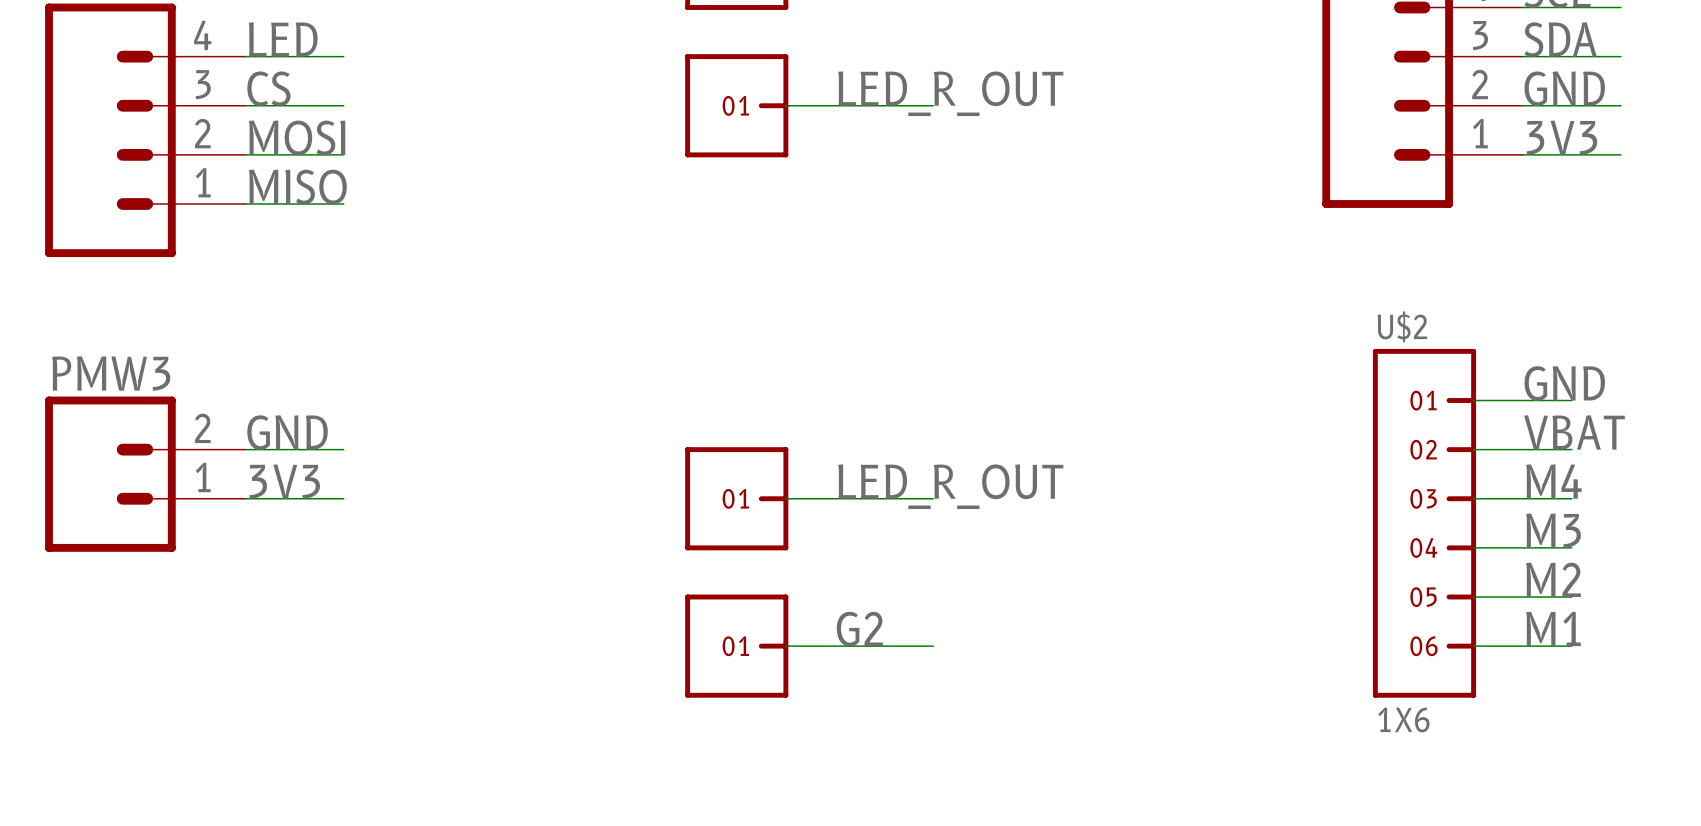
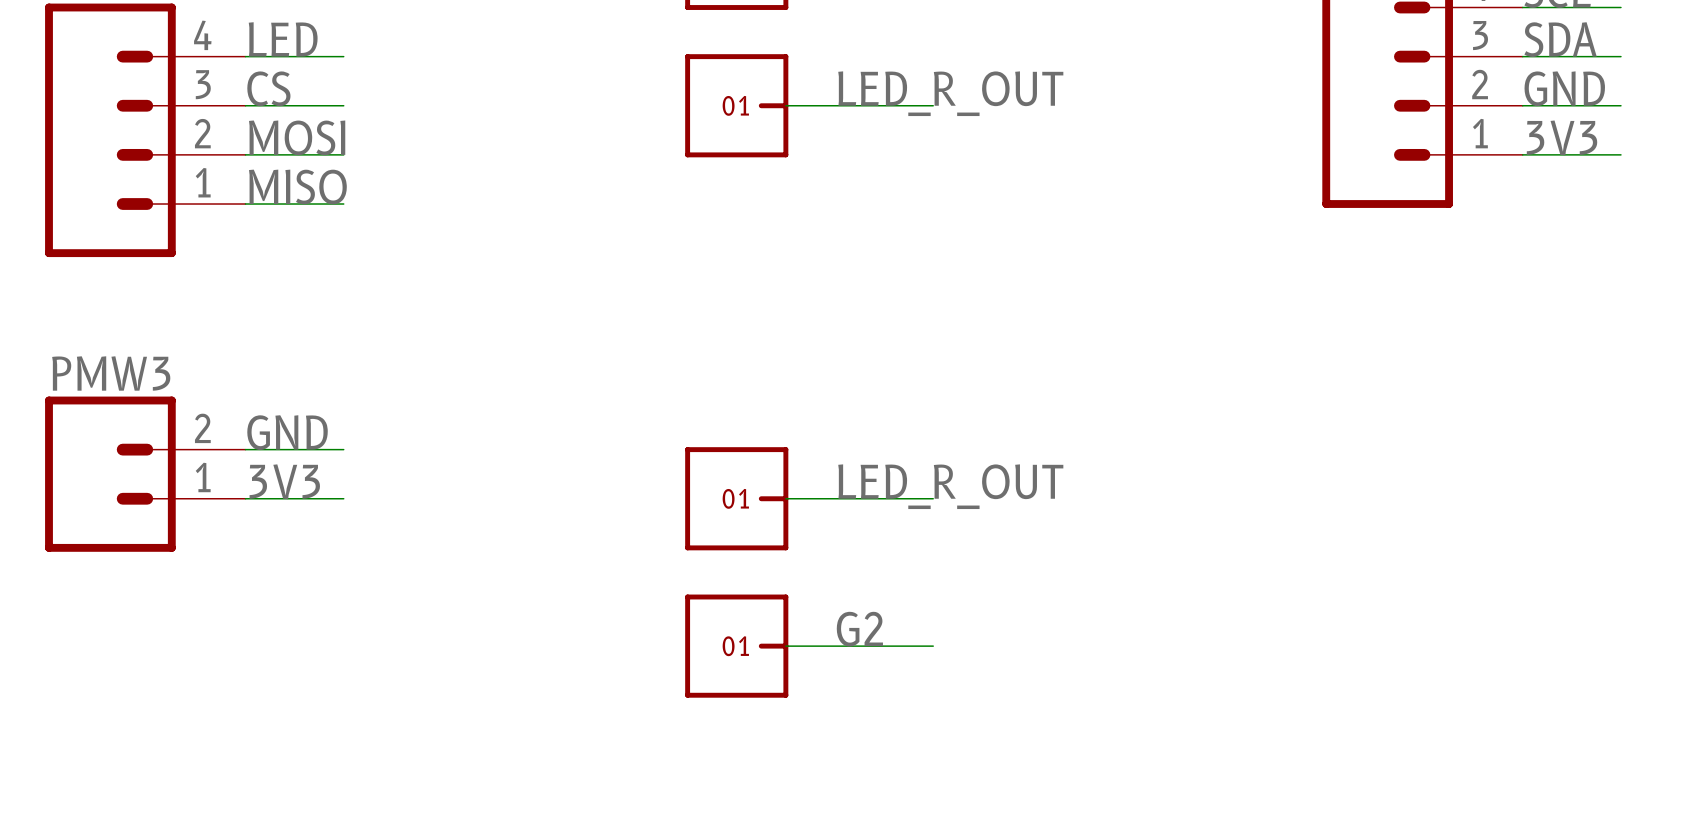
label: GND (1564, 383) -> none
wire: (1473, 400) (1571, 400) -> none
label: VBAT (1574, 432) -> none
wire: (1473, 449) (1571, 449) -> none
label: M4 (1554, 481) -> none
wire: (1473, 498) (1571, 498) -> none
U$2: 1X6 (1424, 523) -> none
label: M3 (1553, 530) -> none
wire: (1473, 547) (1571, 547) -> none
label: M2 (1553, 579) -> none
wire: (1473, 597) (1571, 597) -> none
label: M1 (1553, 628) -> none
wire: (1473, 646) (1571, 646) -> none

